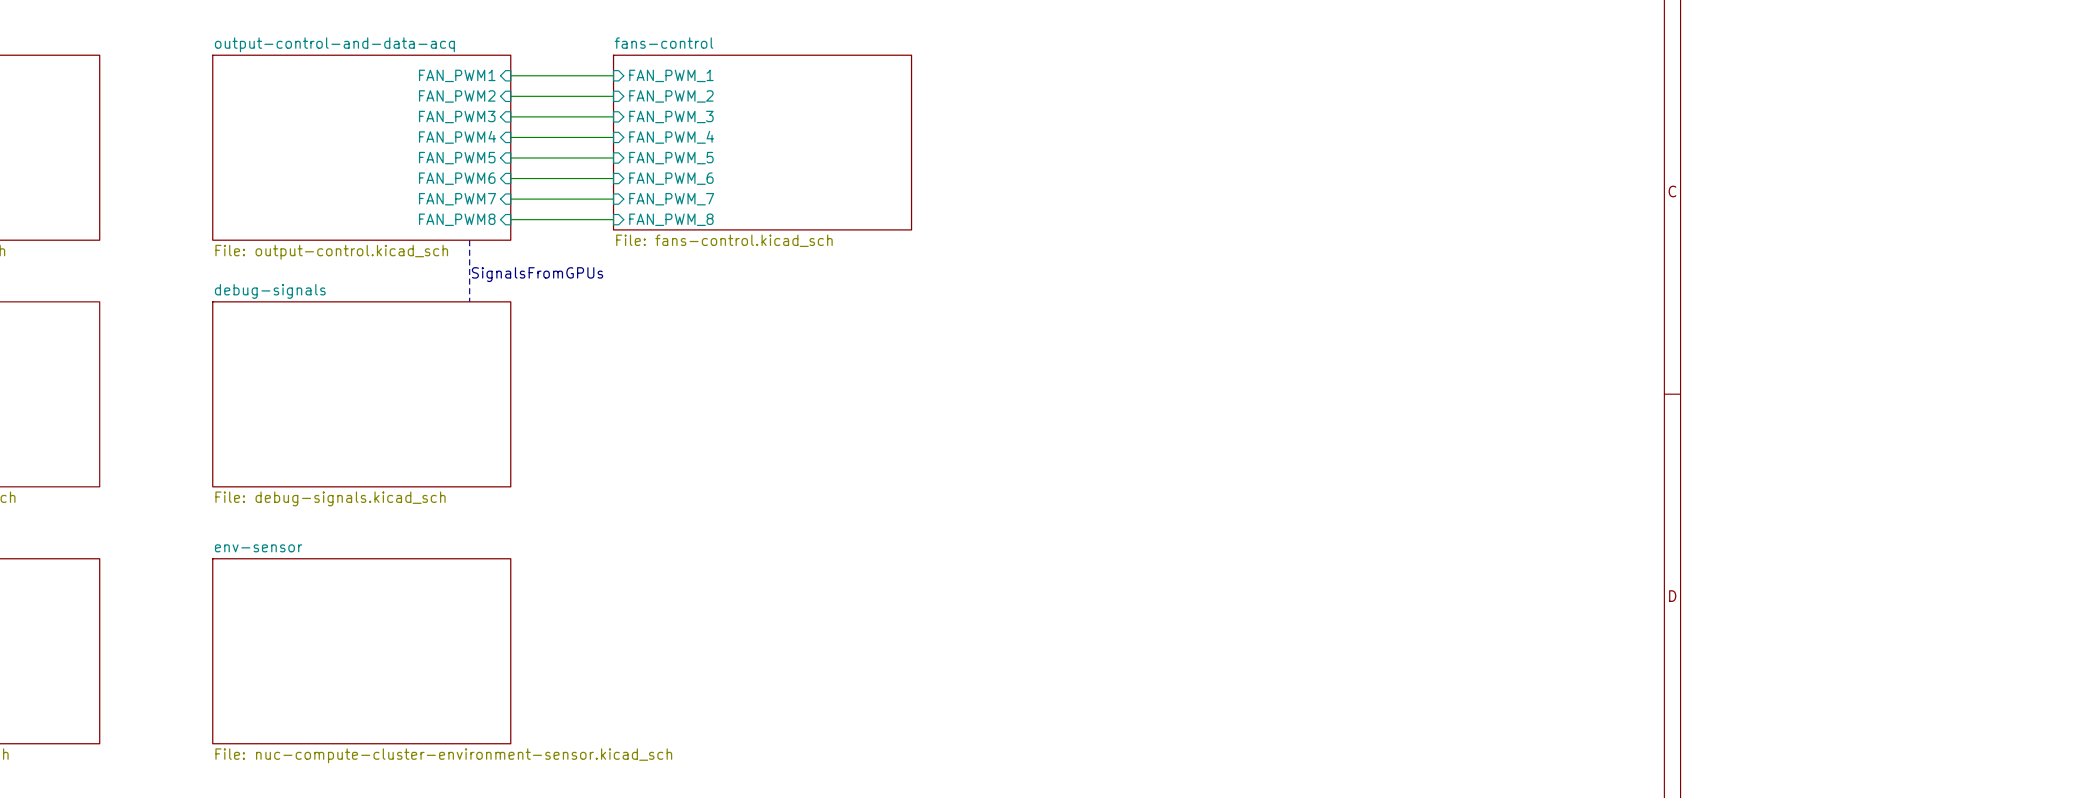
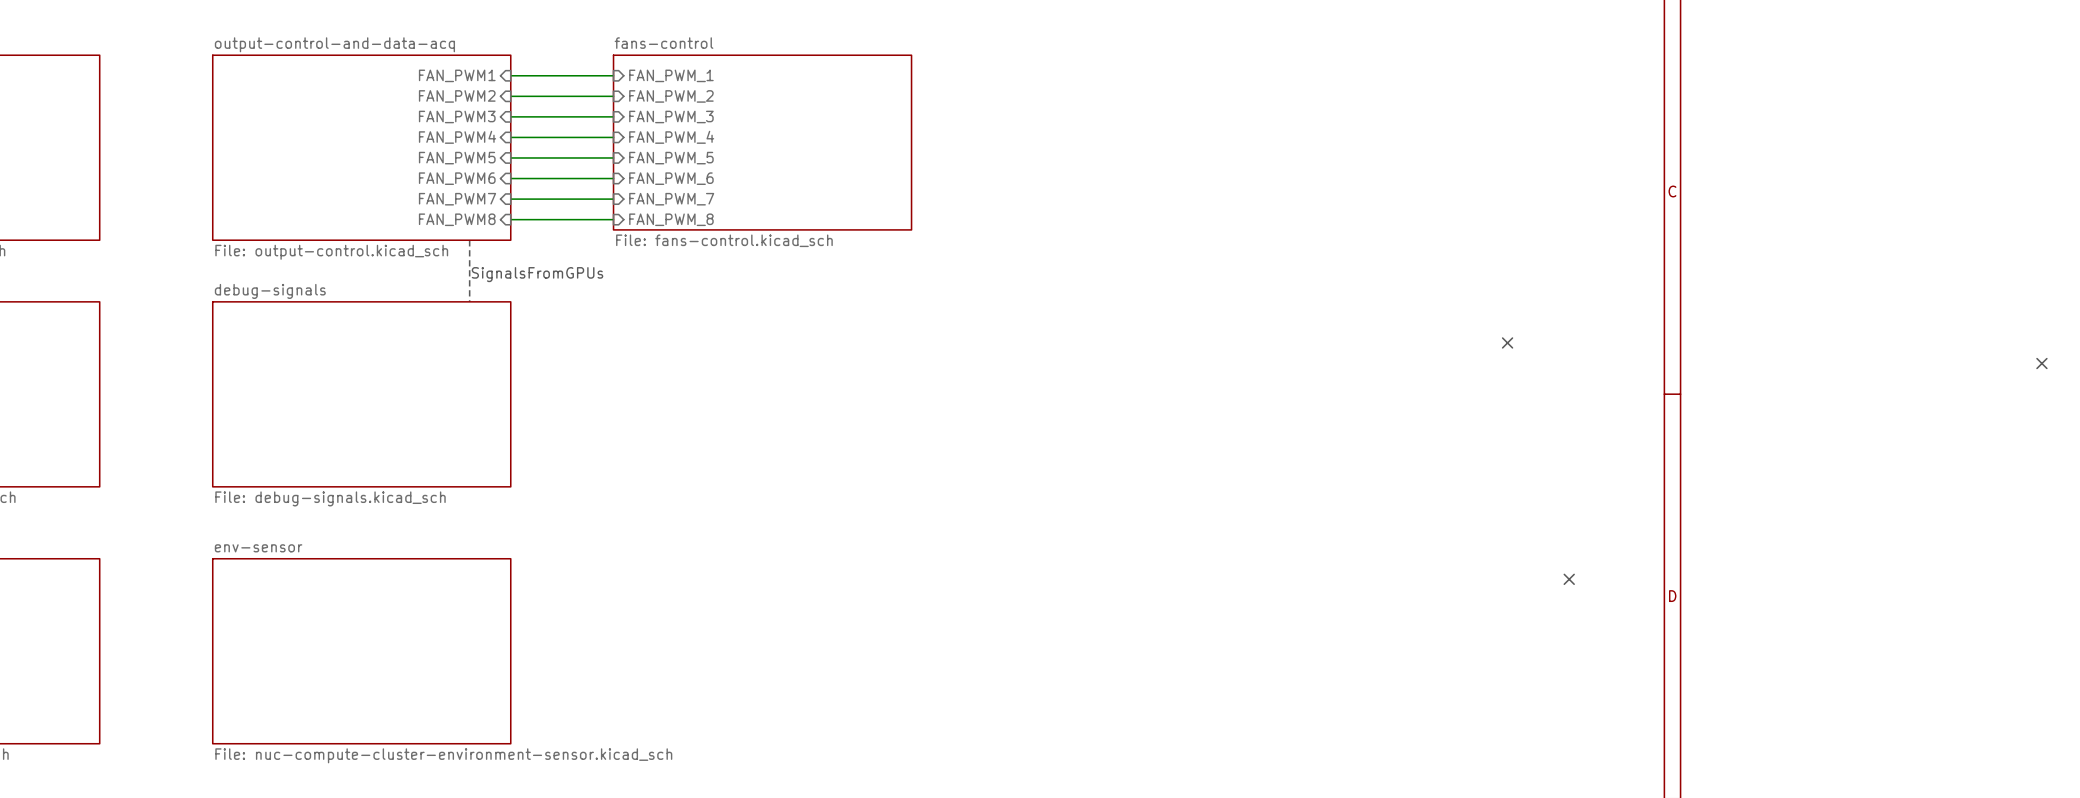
no-connect mark: none -> (1507, 342)
no-connect mark: none -> (2041, 363)
no-connect mark: none -> (1569, 579)

